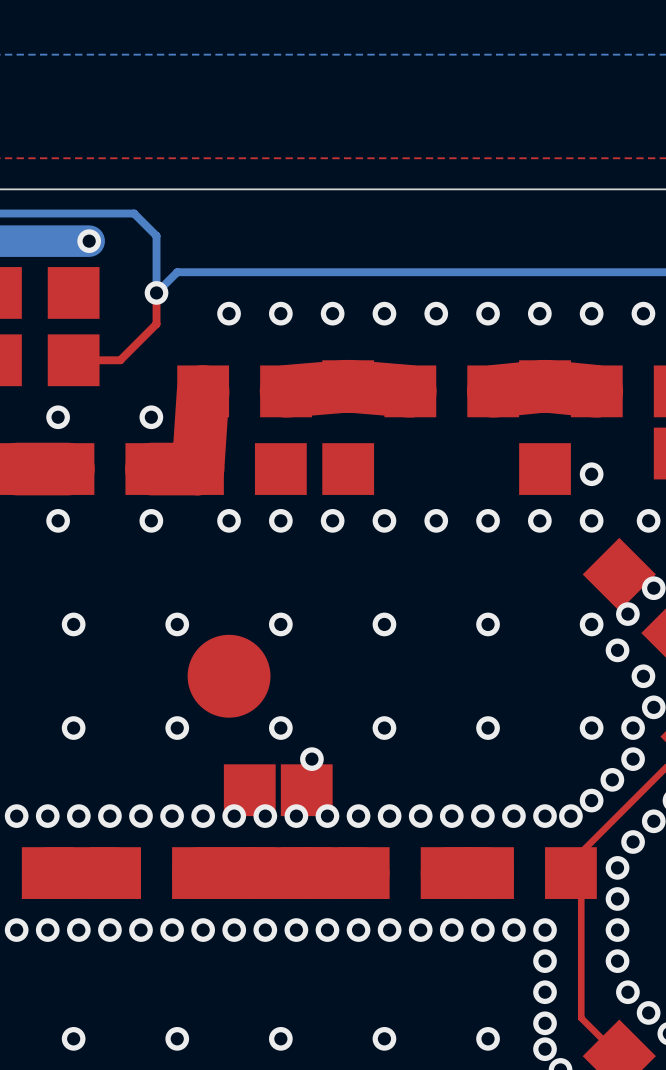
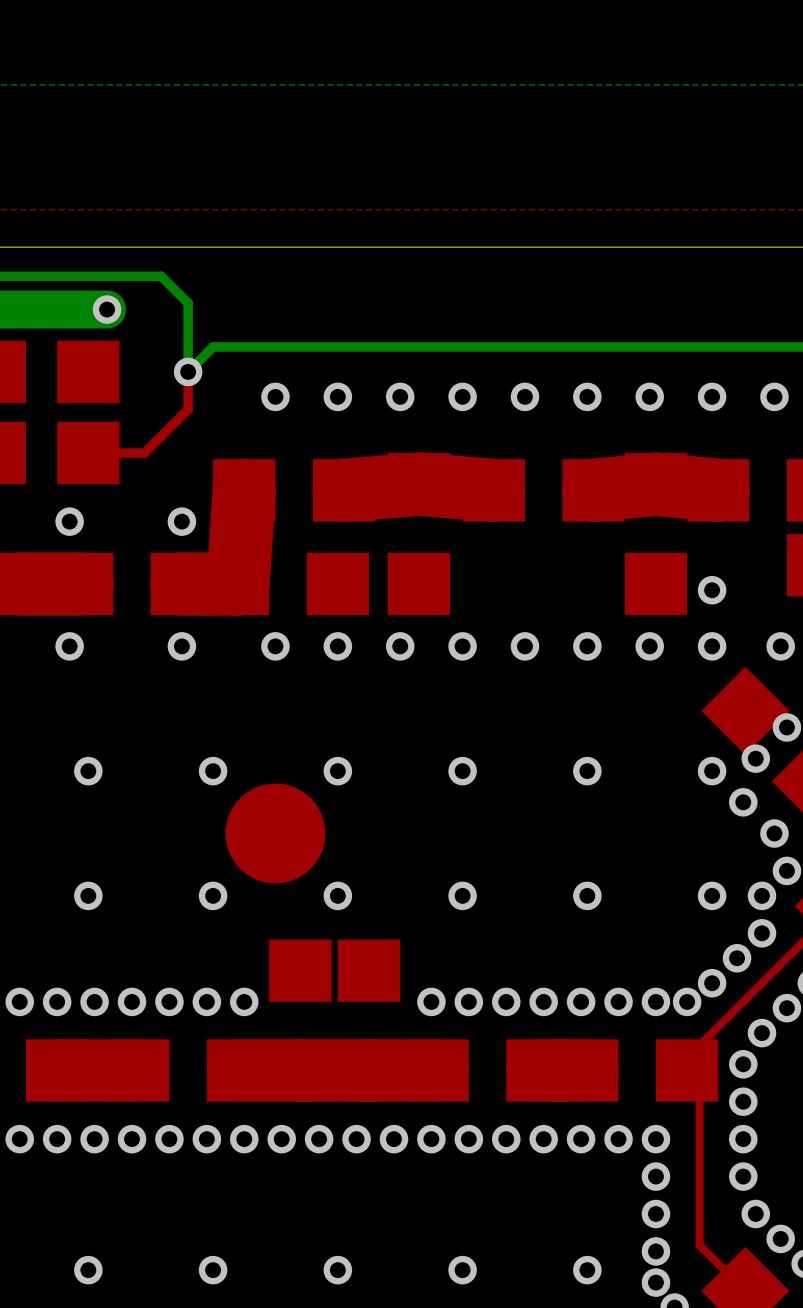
via: (311, 759) -> none
via: (234, 816) -> none
via: (265, 816) -> none
via: (296, 816) -> none
via: (327, 816) -> none

